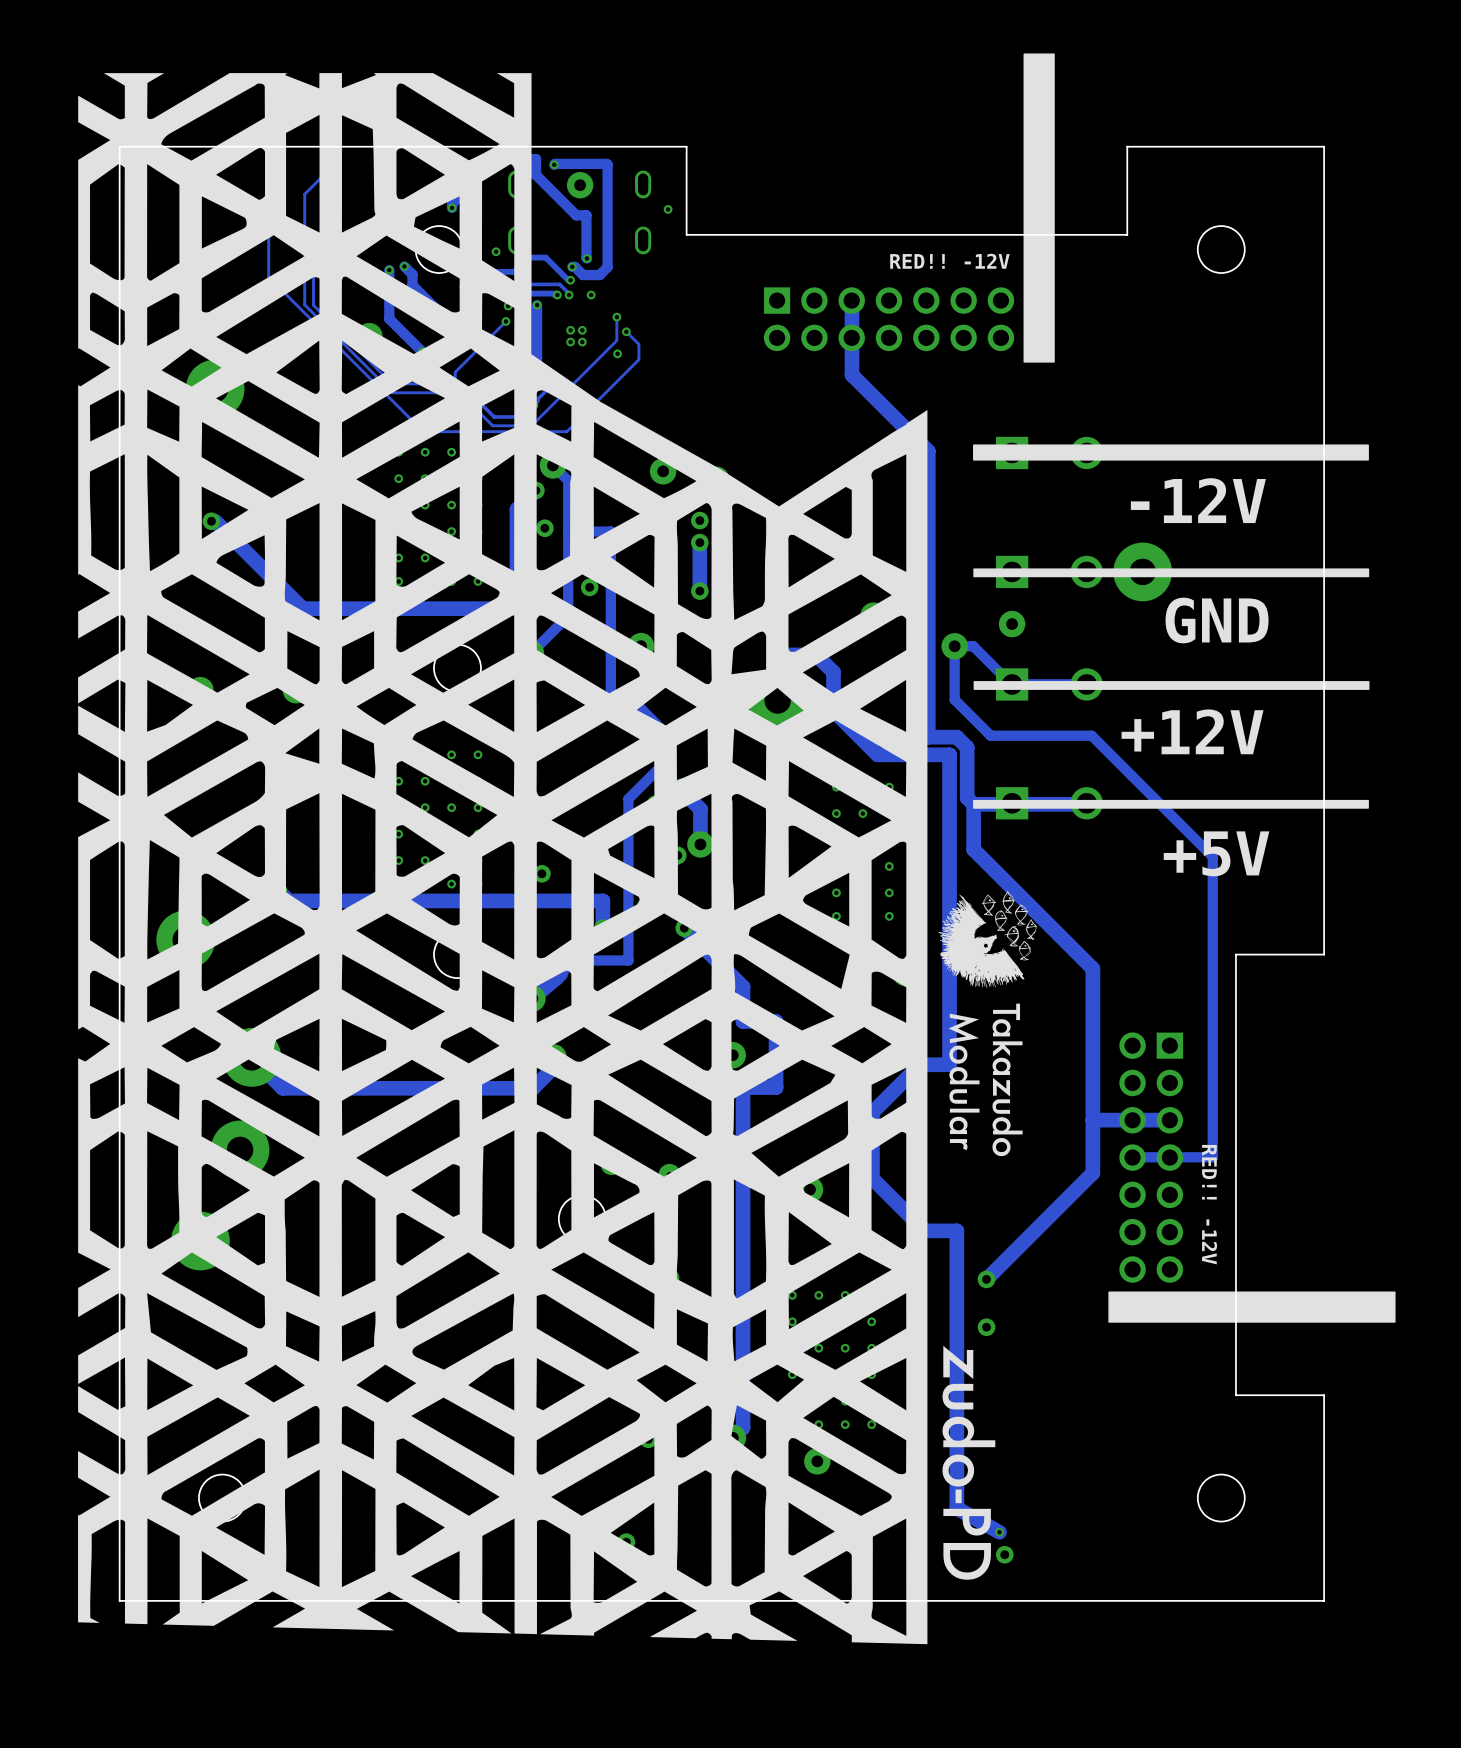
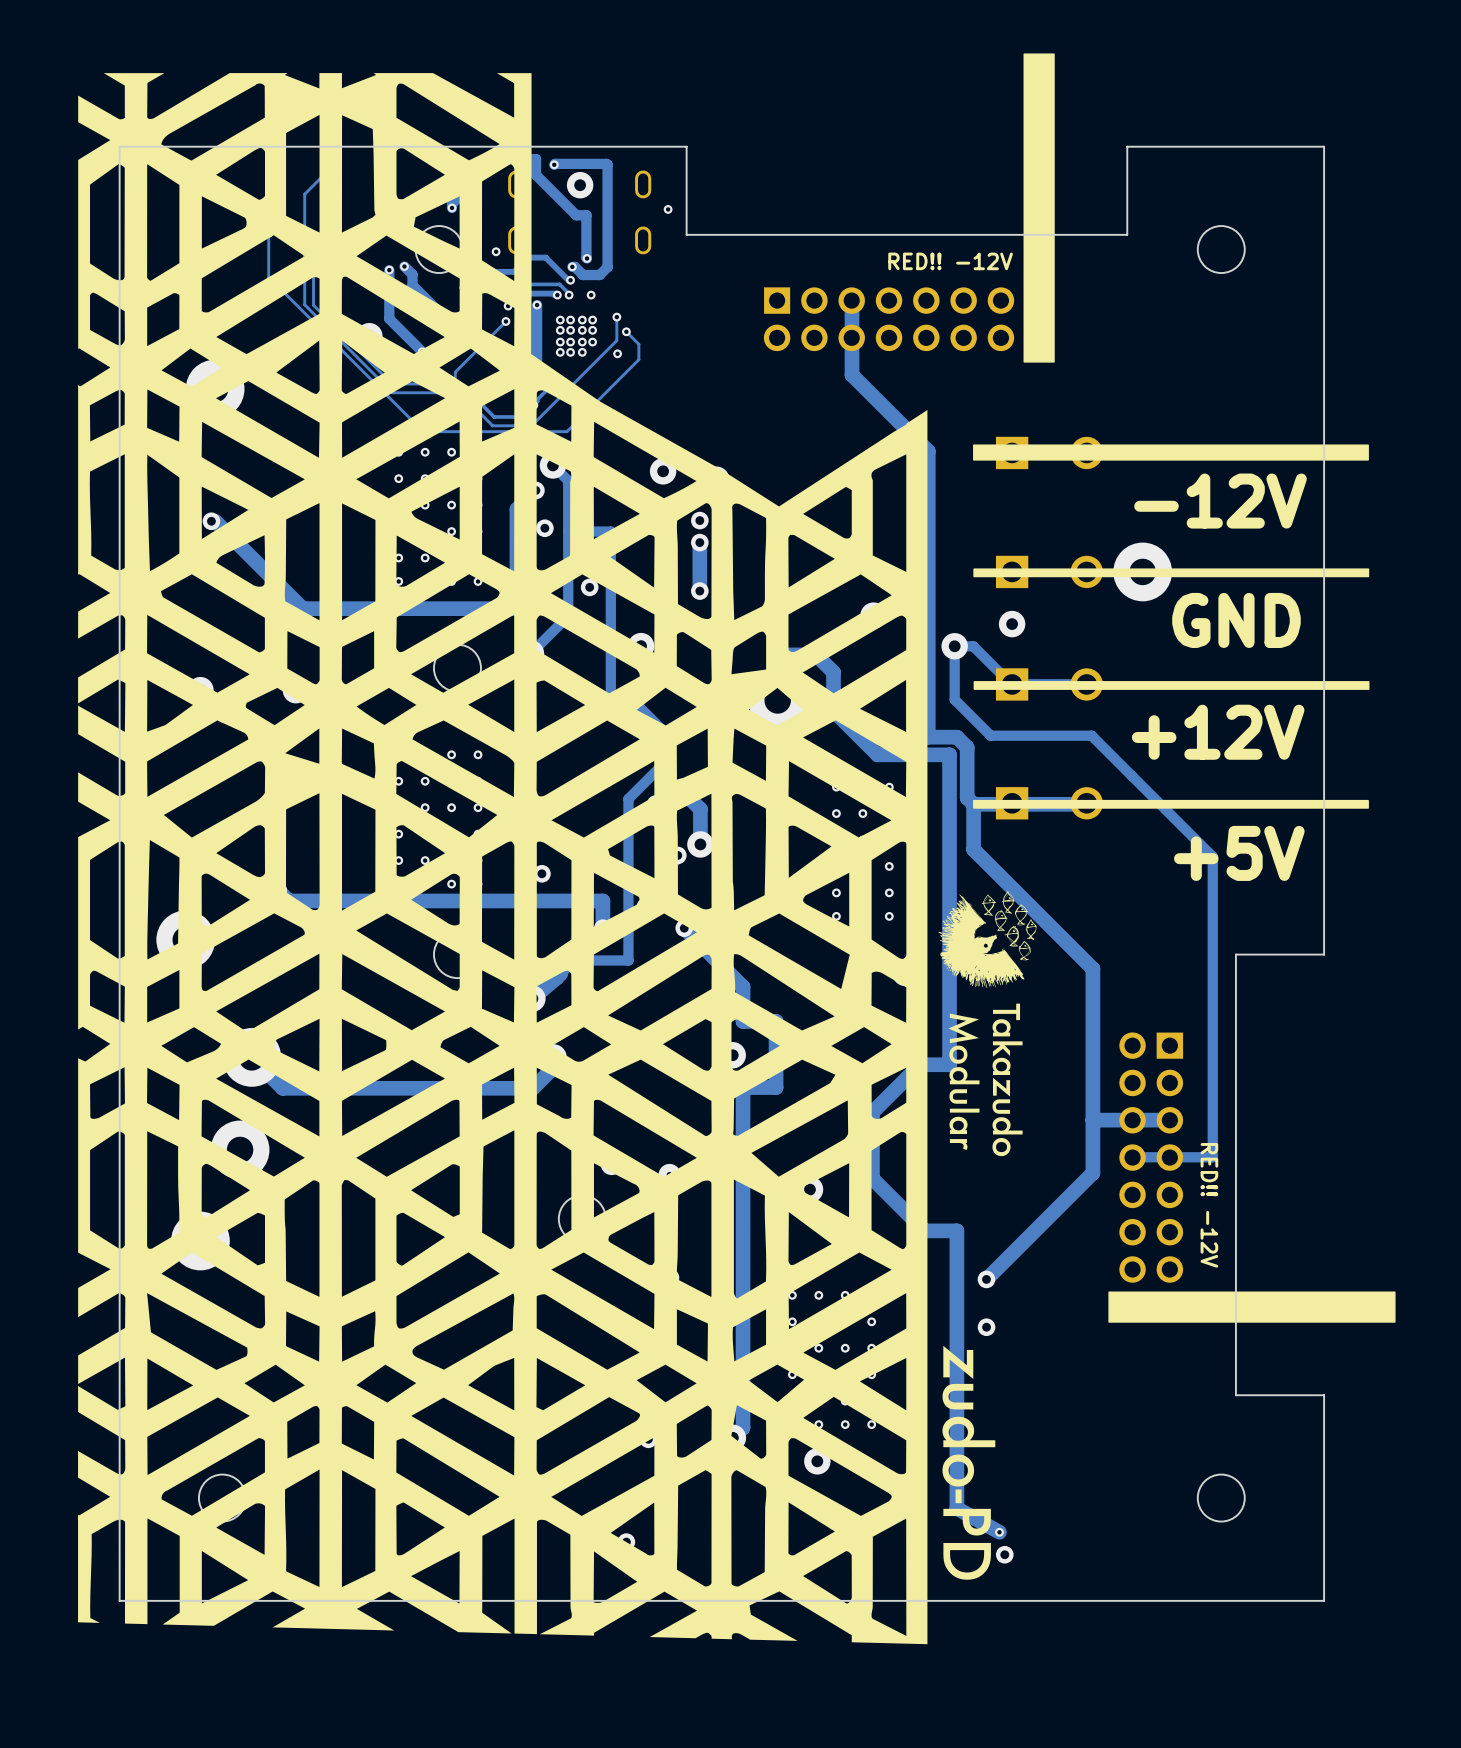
via: none -> (560, 320)
via: none -> (570, 320)
via: none -> (582, 320)
via: none -> (592, 320)
via: none -> (560, 330)
via: none -> (592, 330)
via: none -> (560, 342)
via: none -> (592, 342)
via: none -> (560, 352)
via: none -> (570, 352)
via: none -> (582, 352)

